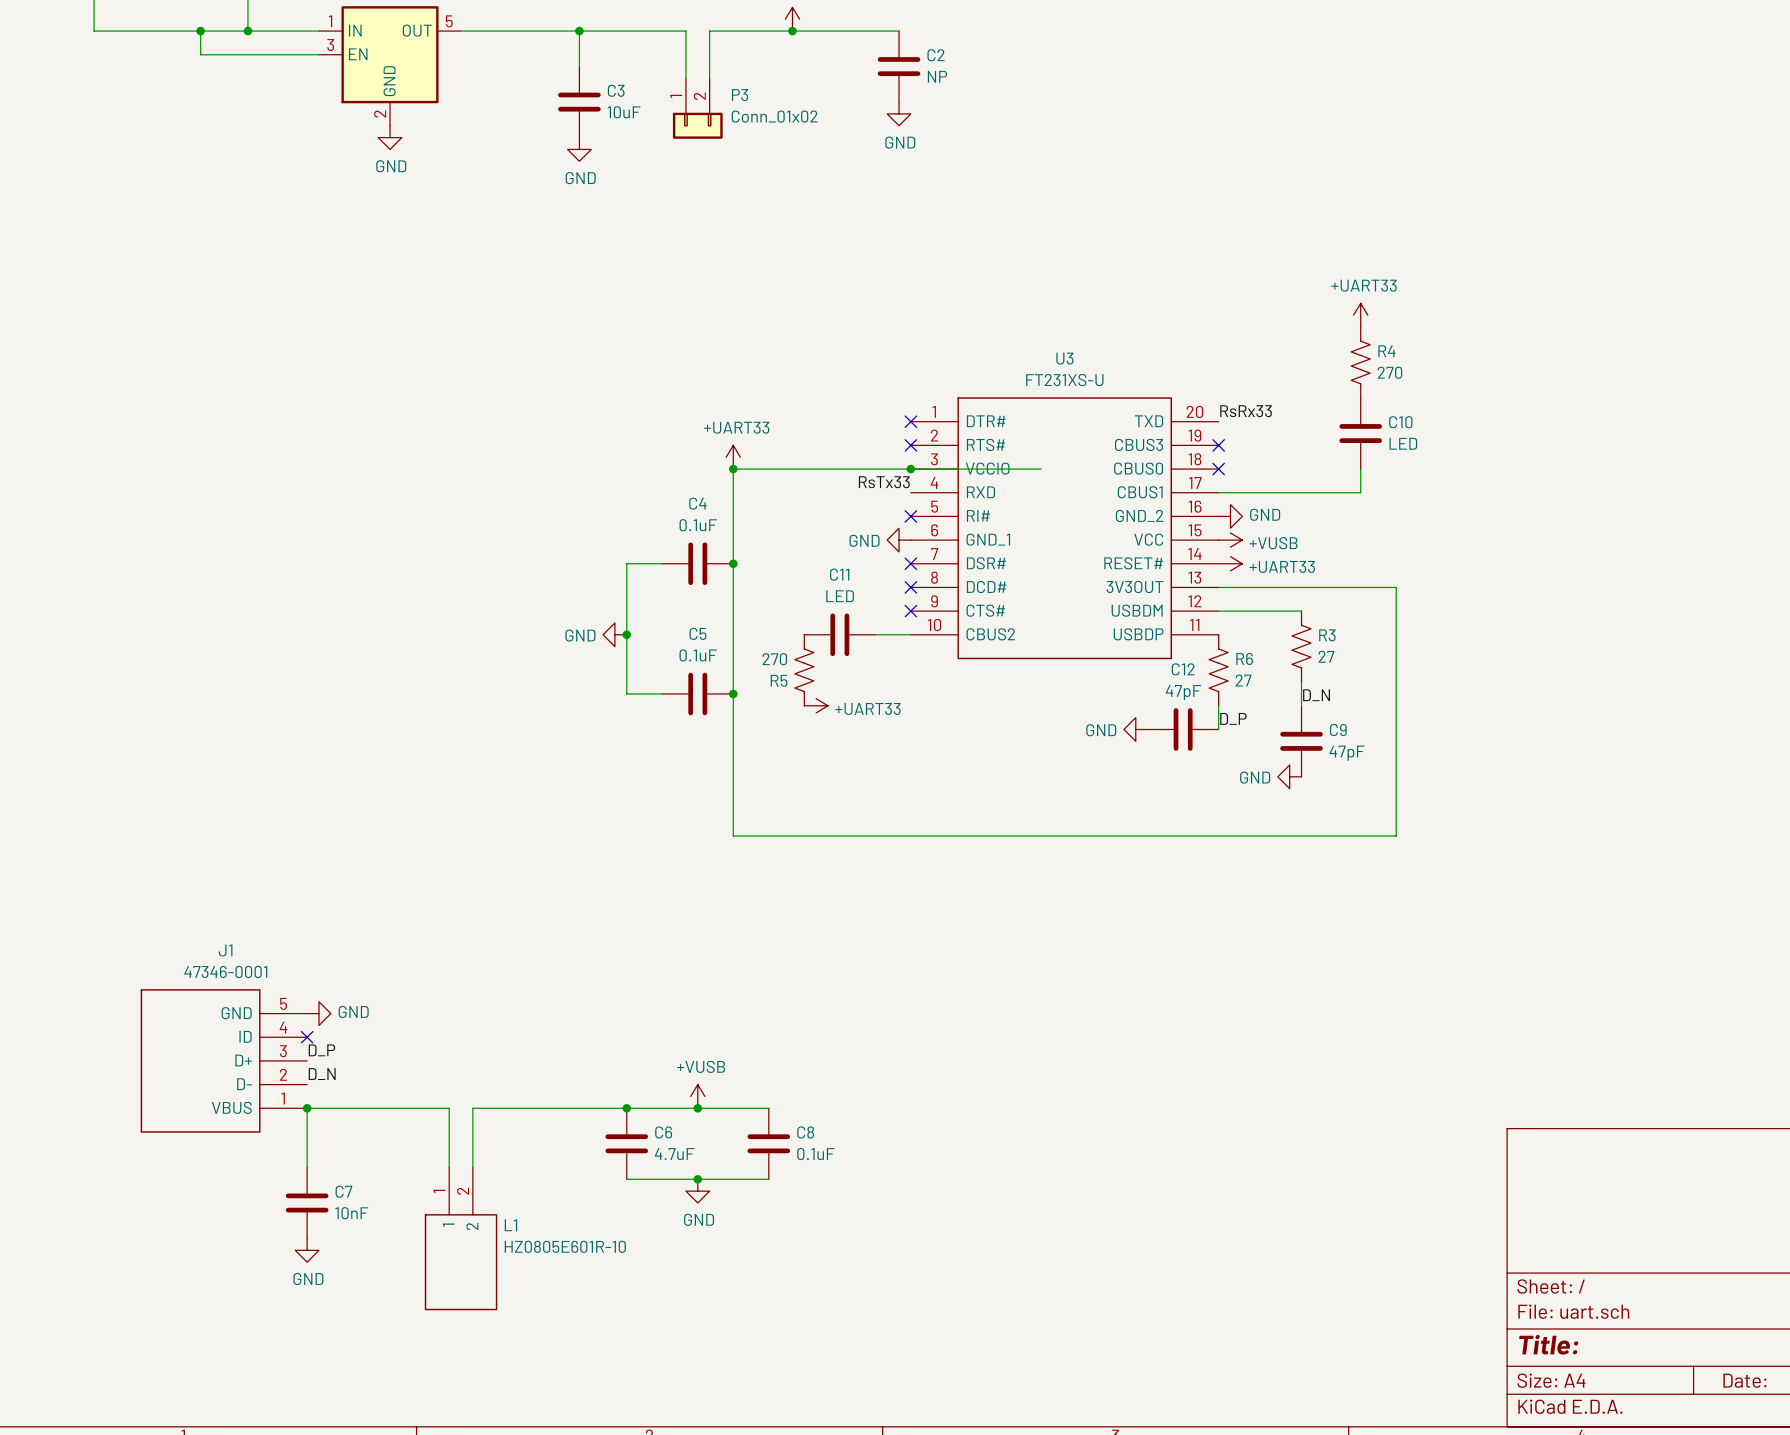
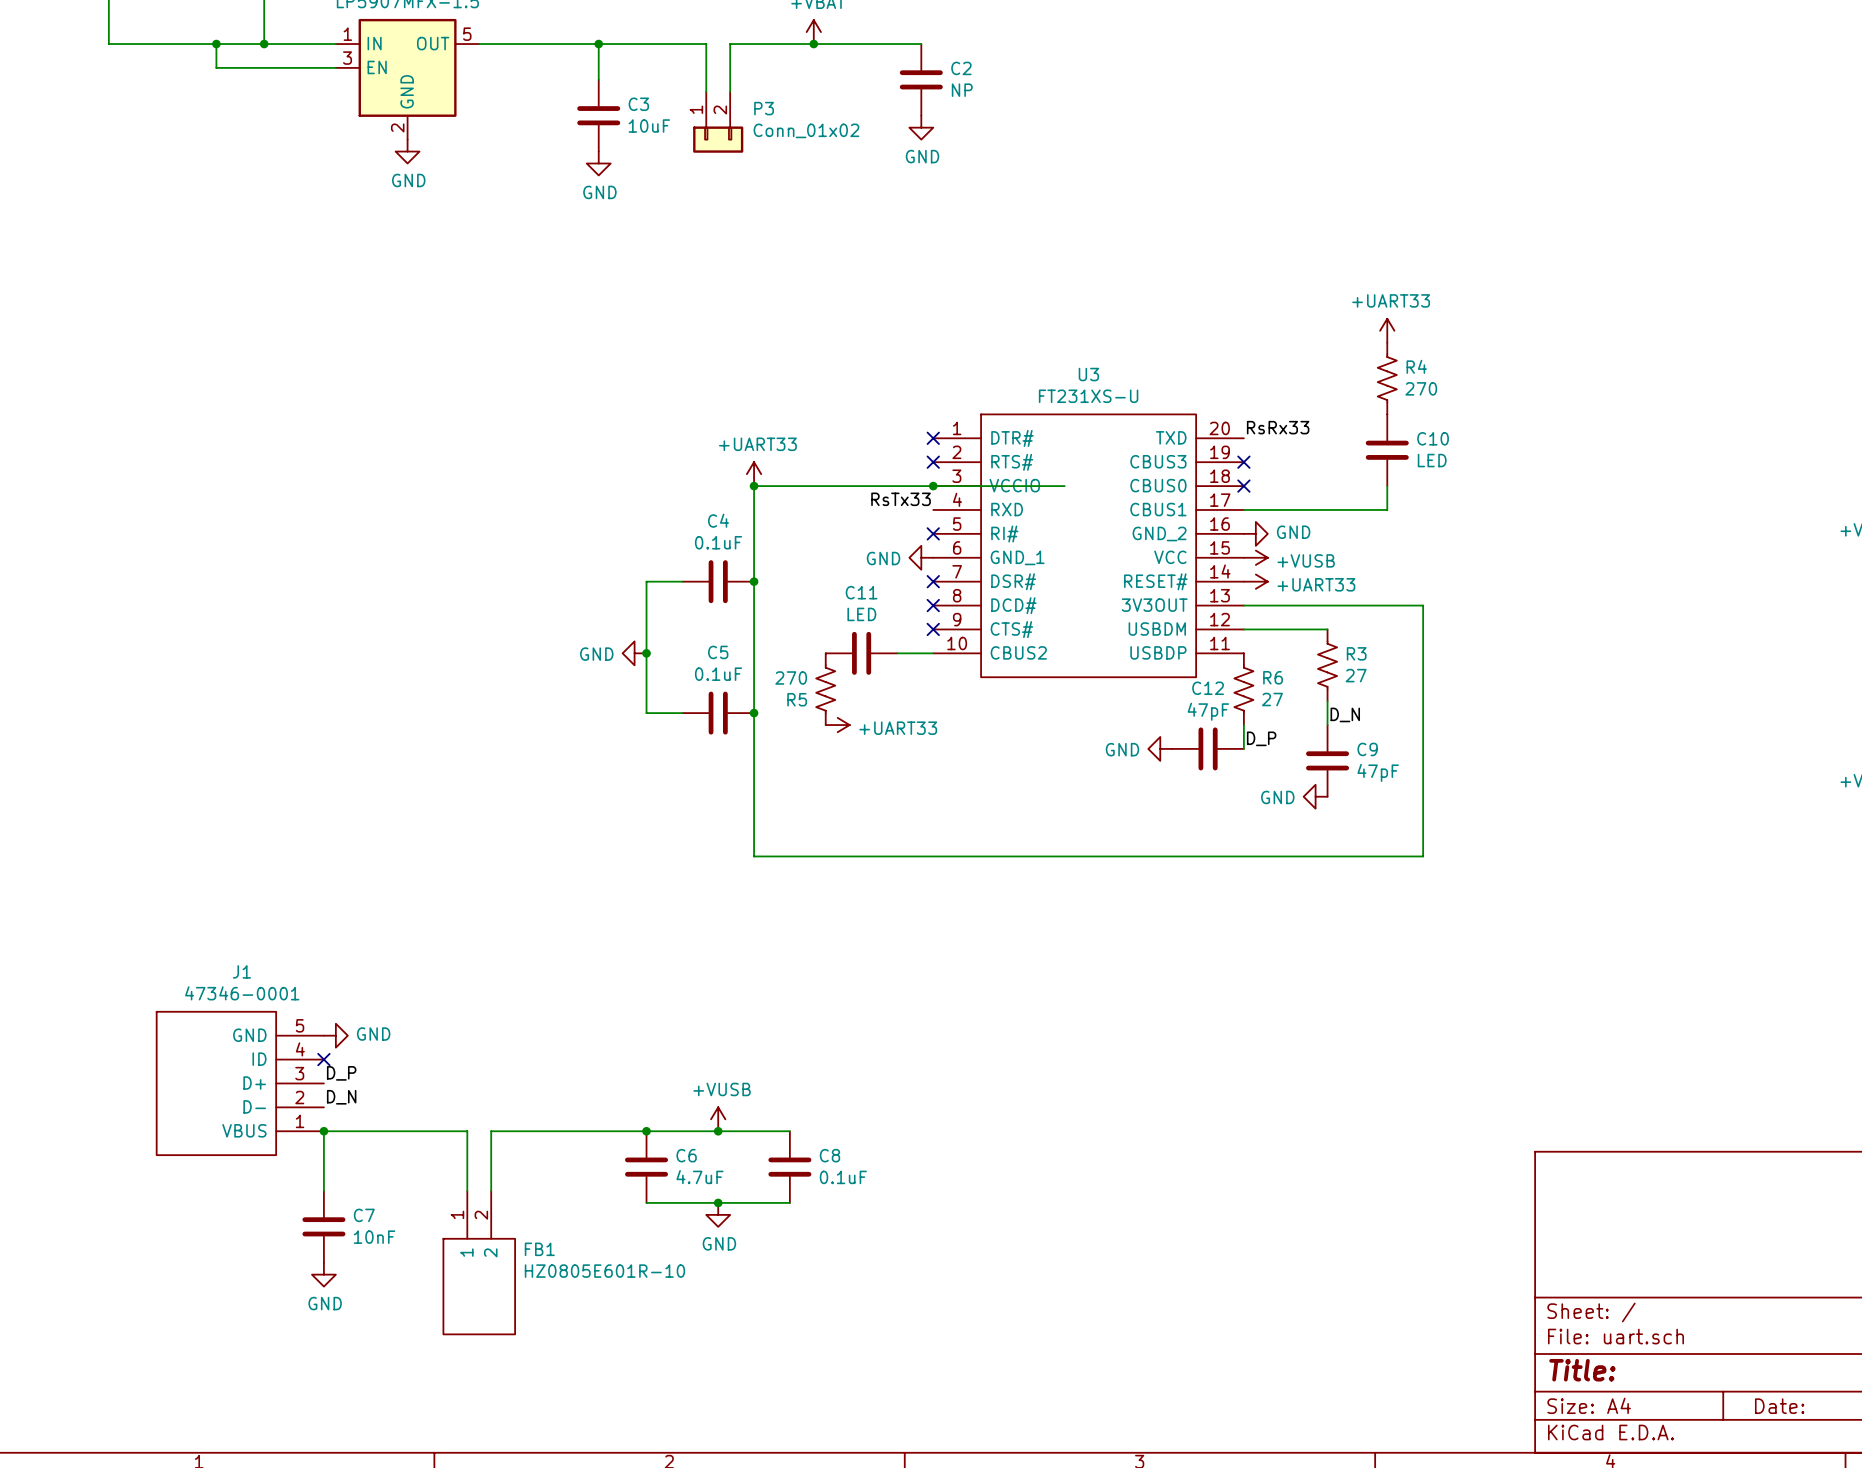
L1 name: L1 (510, 1225) -> FB1 (539, 1249)

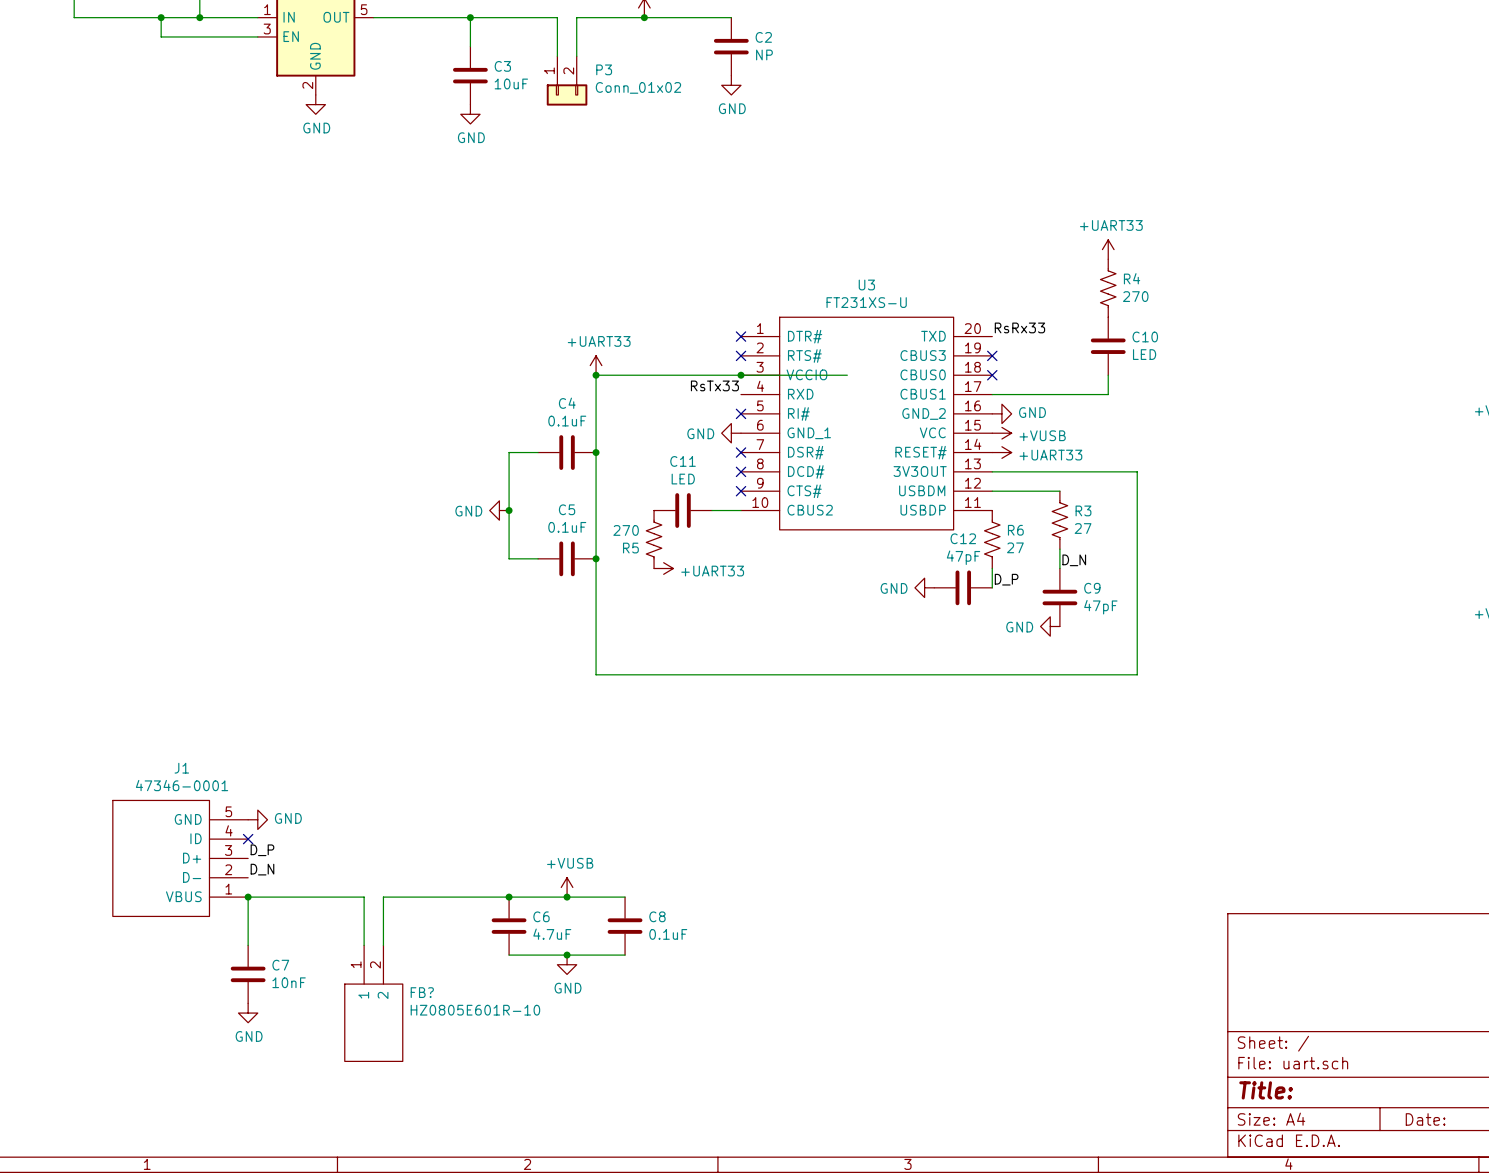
FB1 name: FB1 (539, 1249) -> FB? (422, 992)

